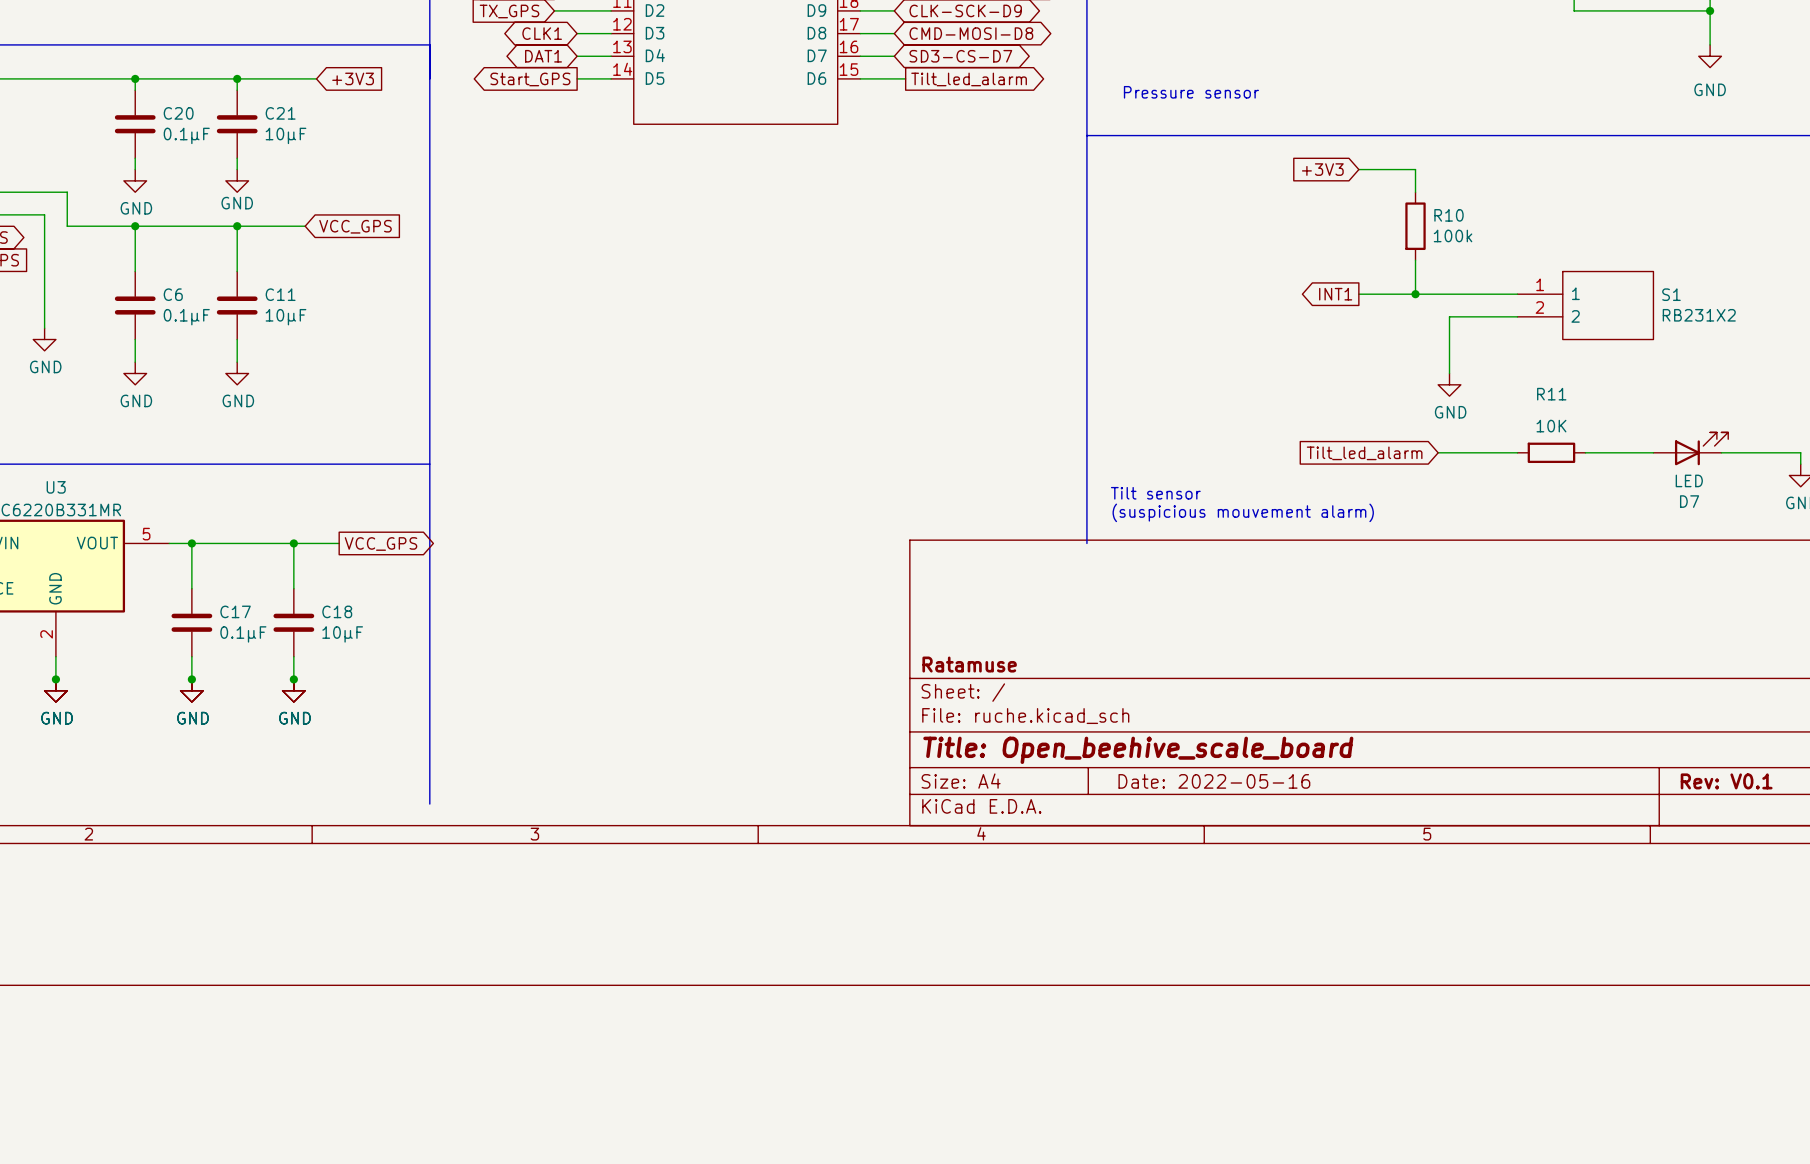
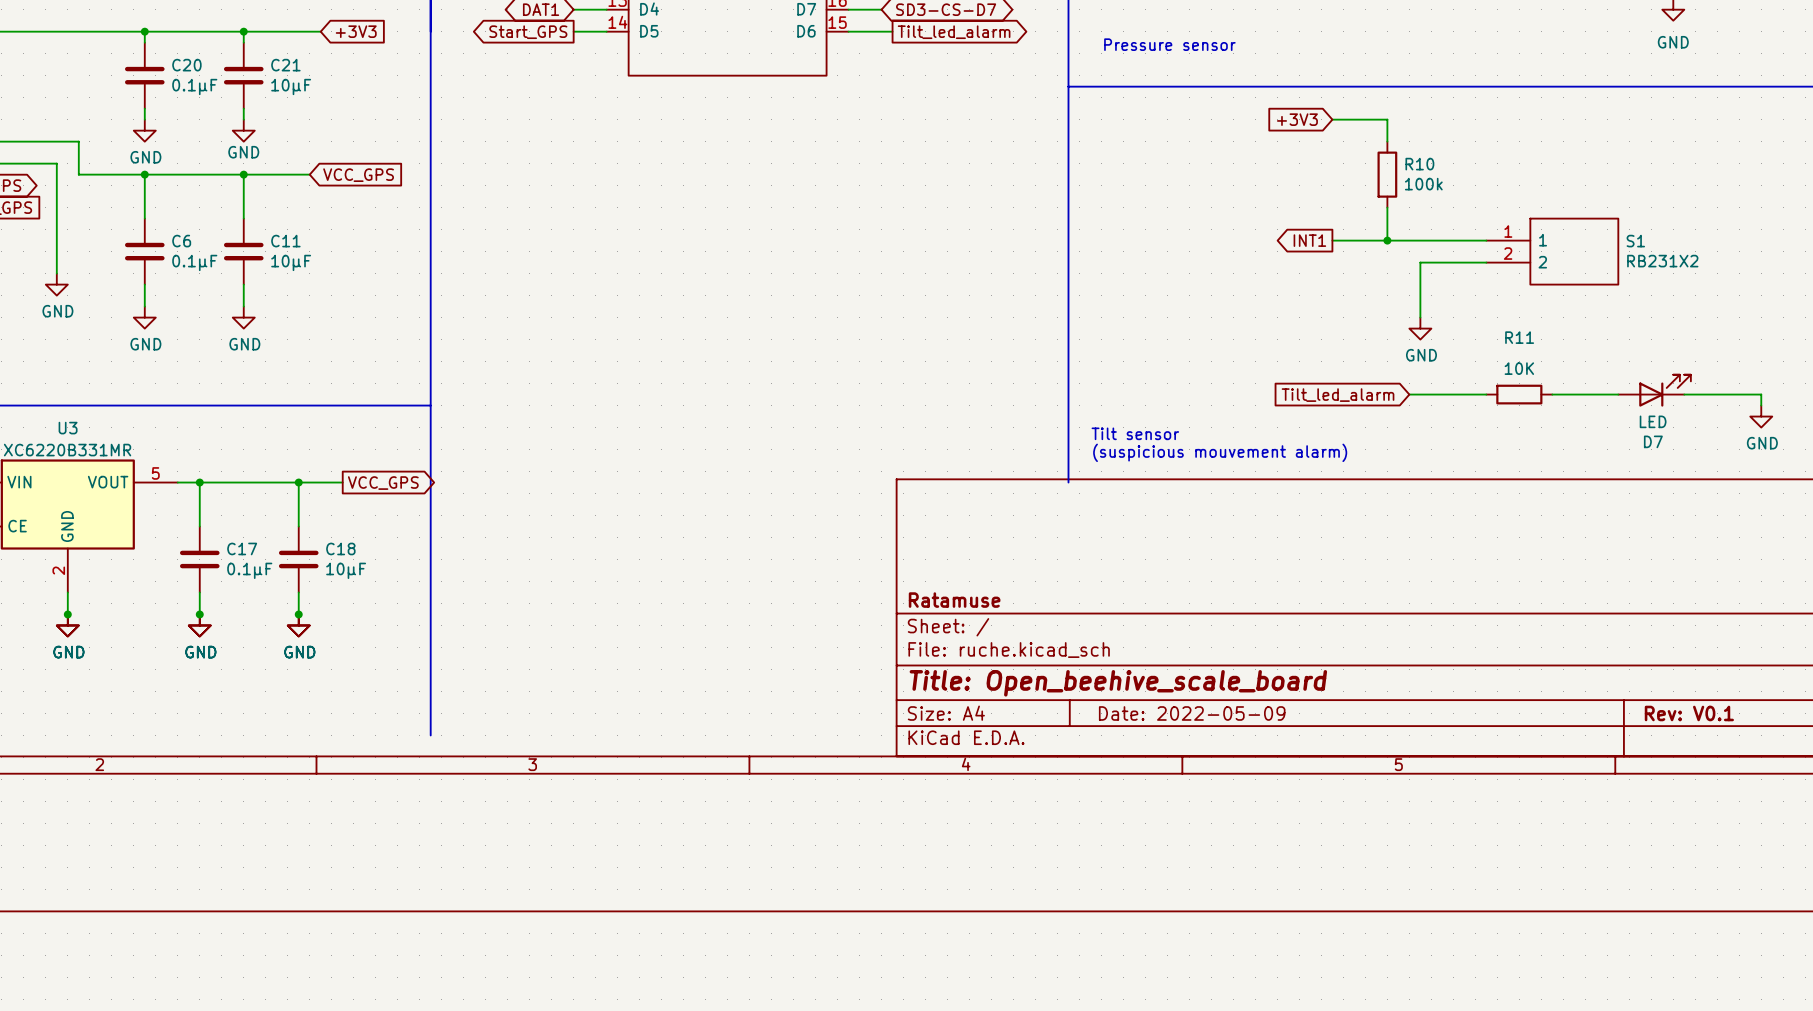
title block: Date: 2022-05-16 (1214, 781) -> Date: 2022-05-09 (1192, 713)

